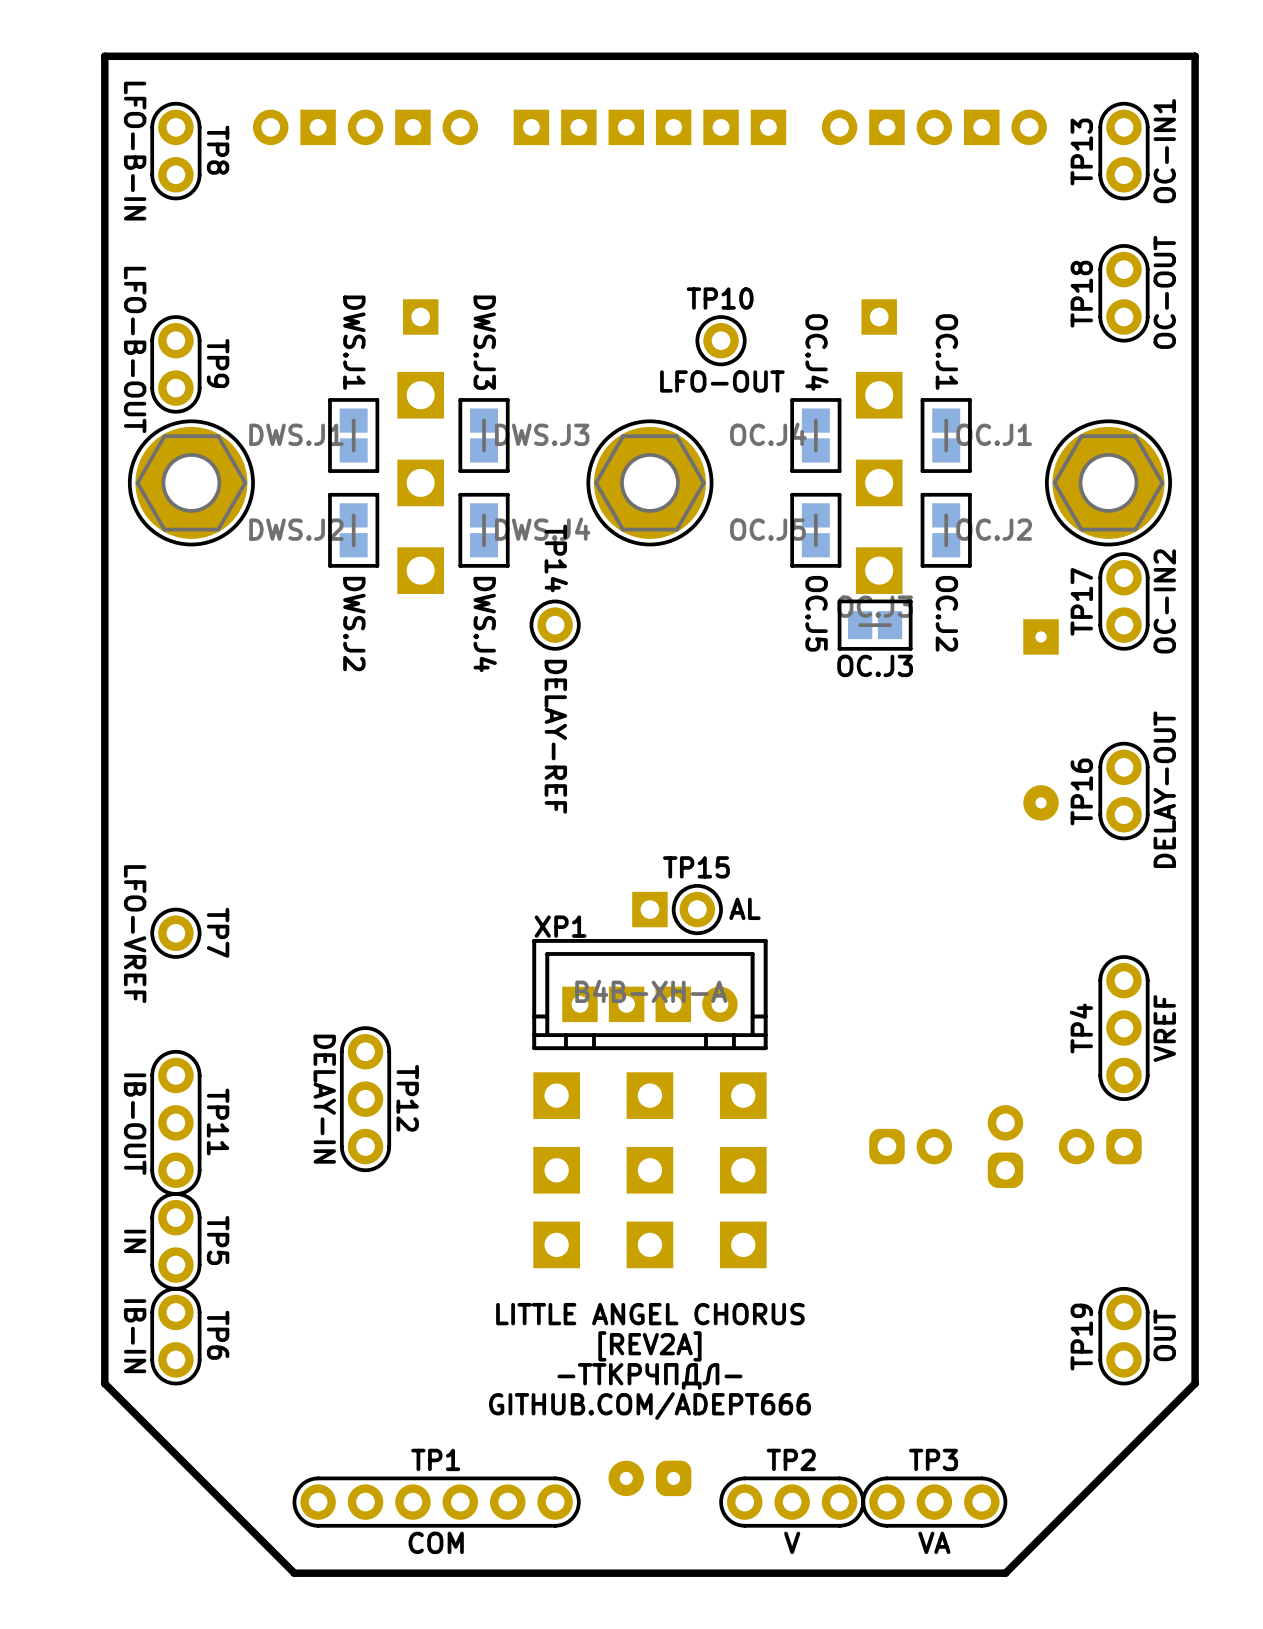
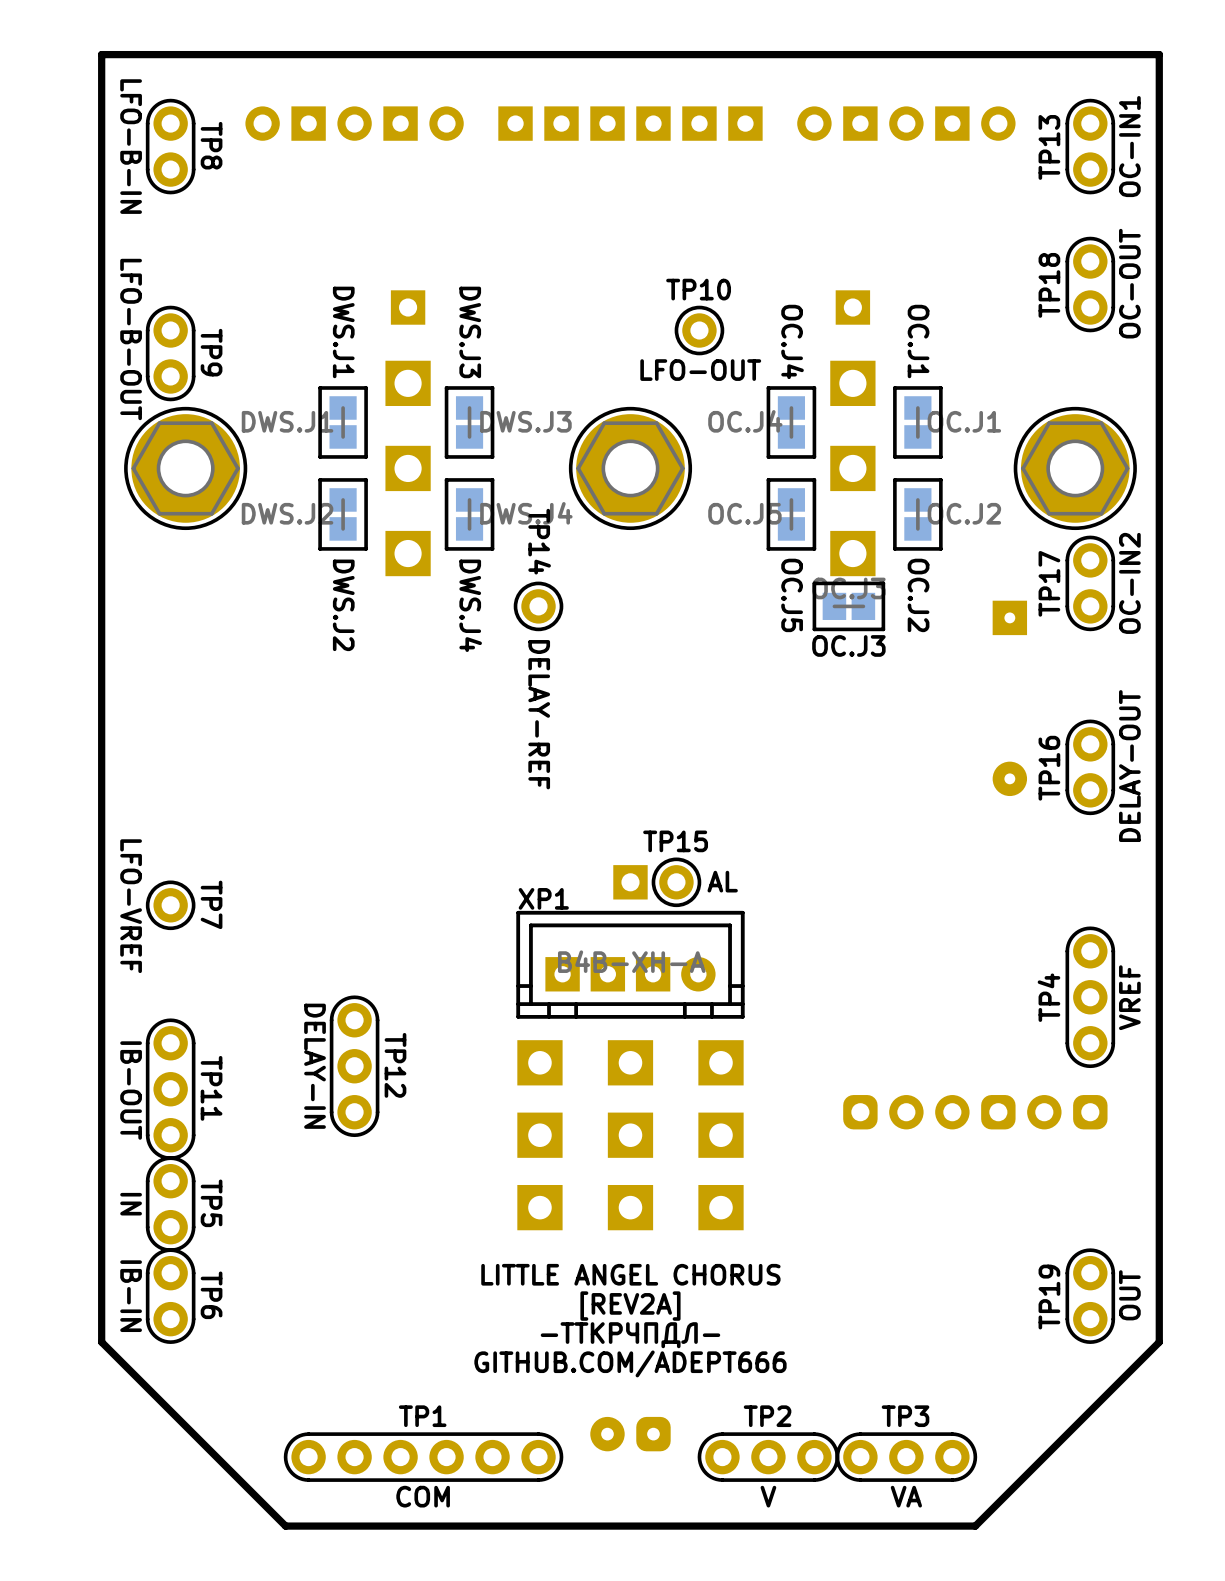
part rotation: 0° (1005, 1146) -> 90° counterclockwise (975, 1112)

